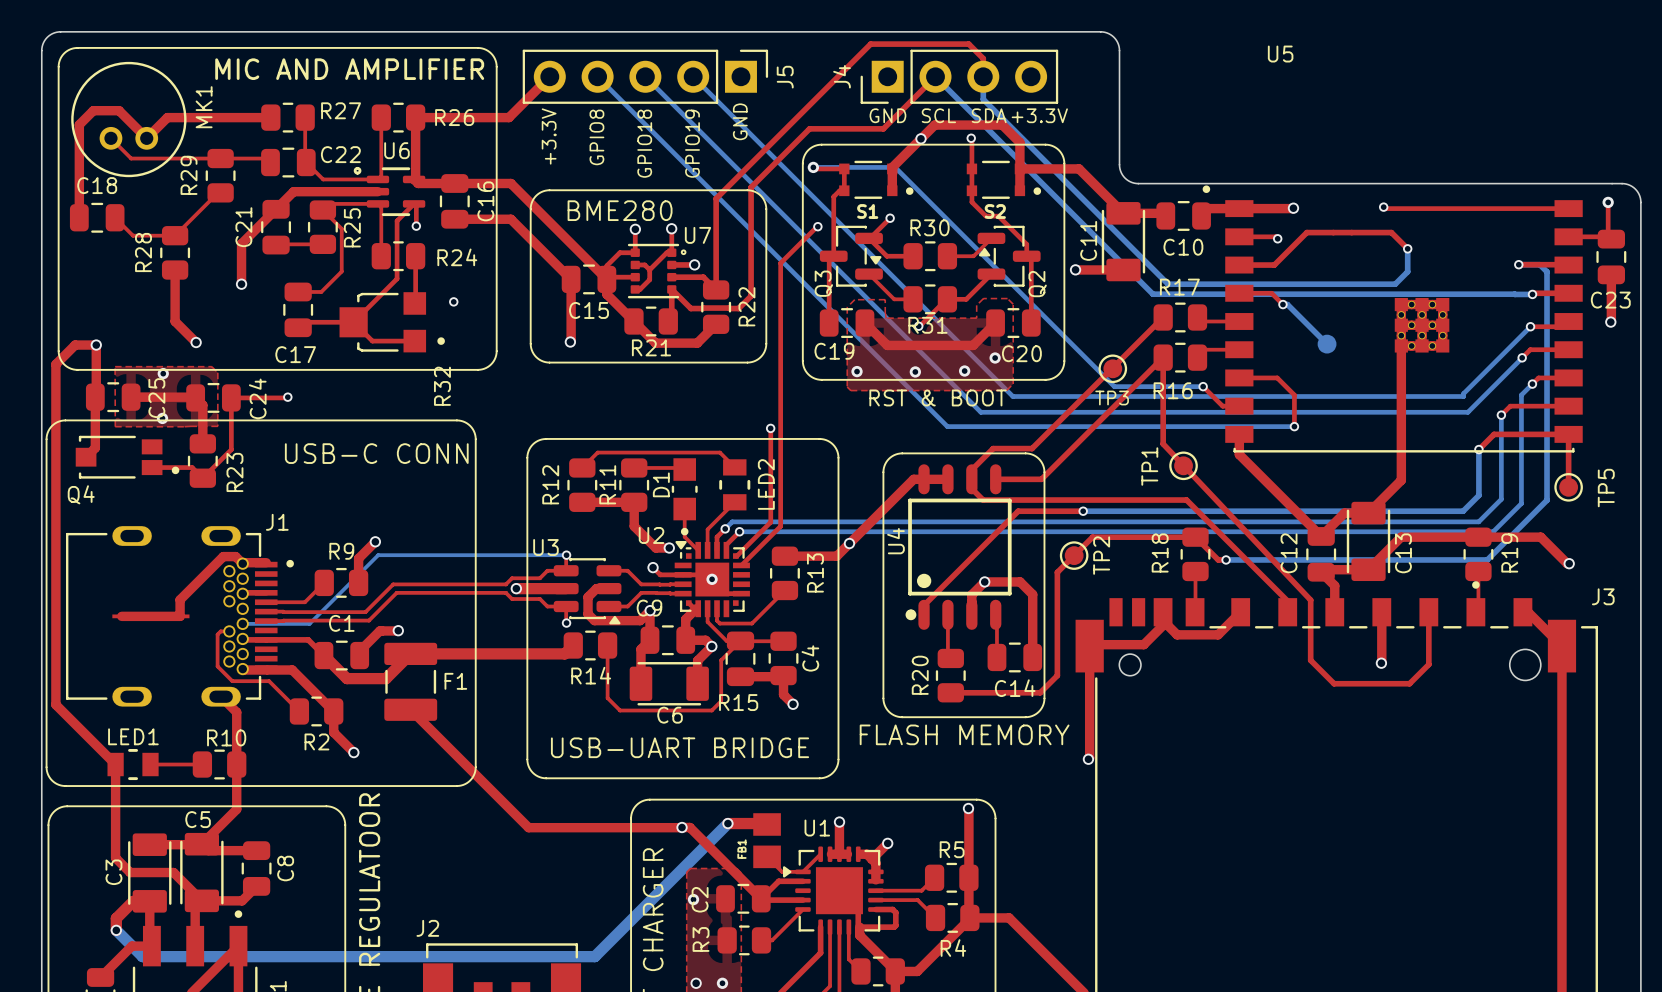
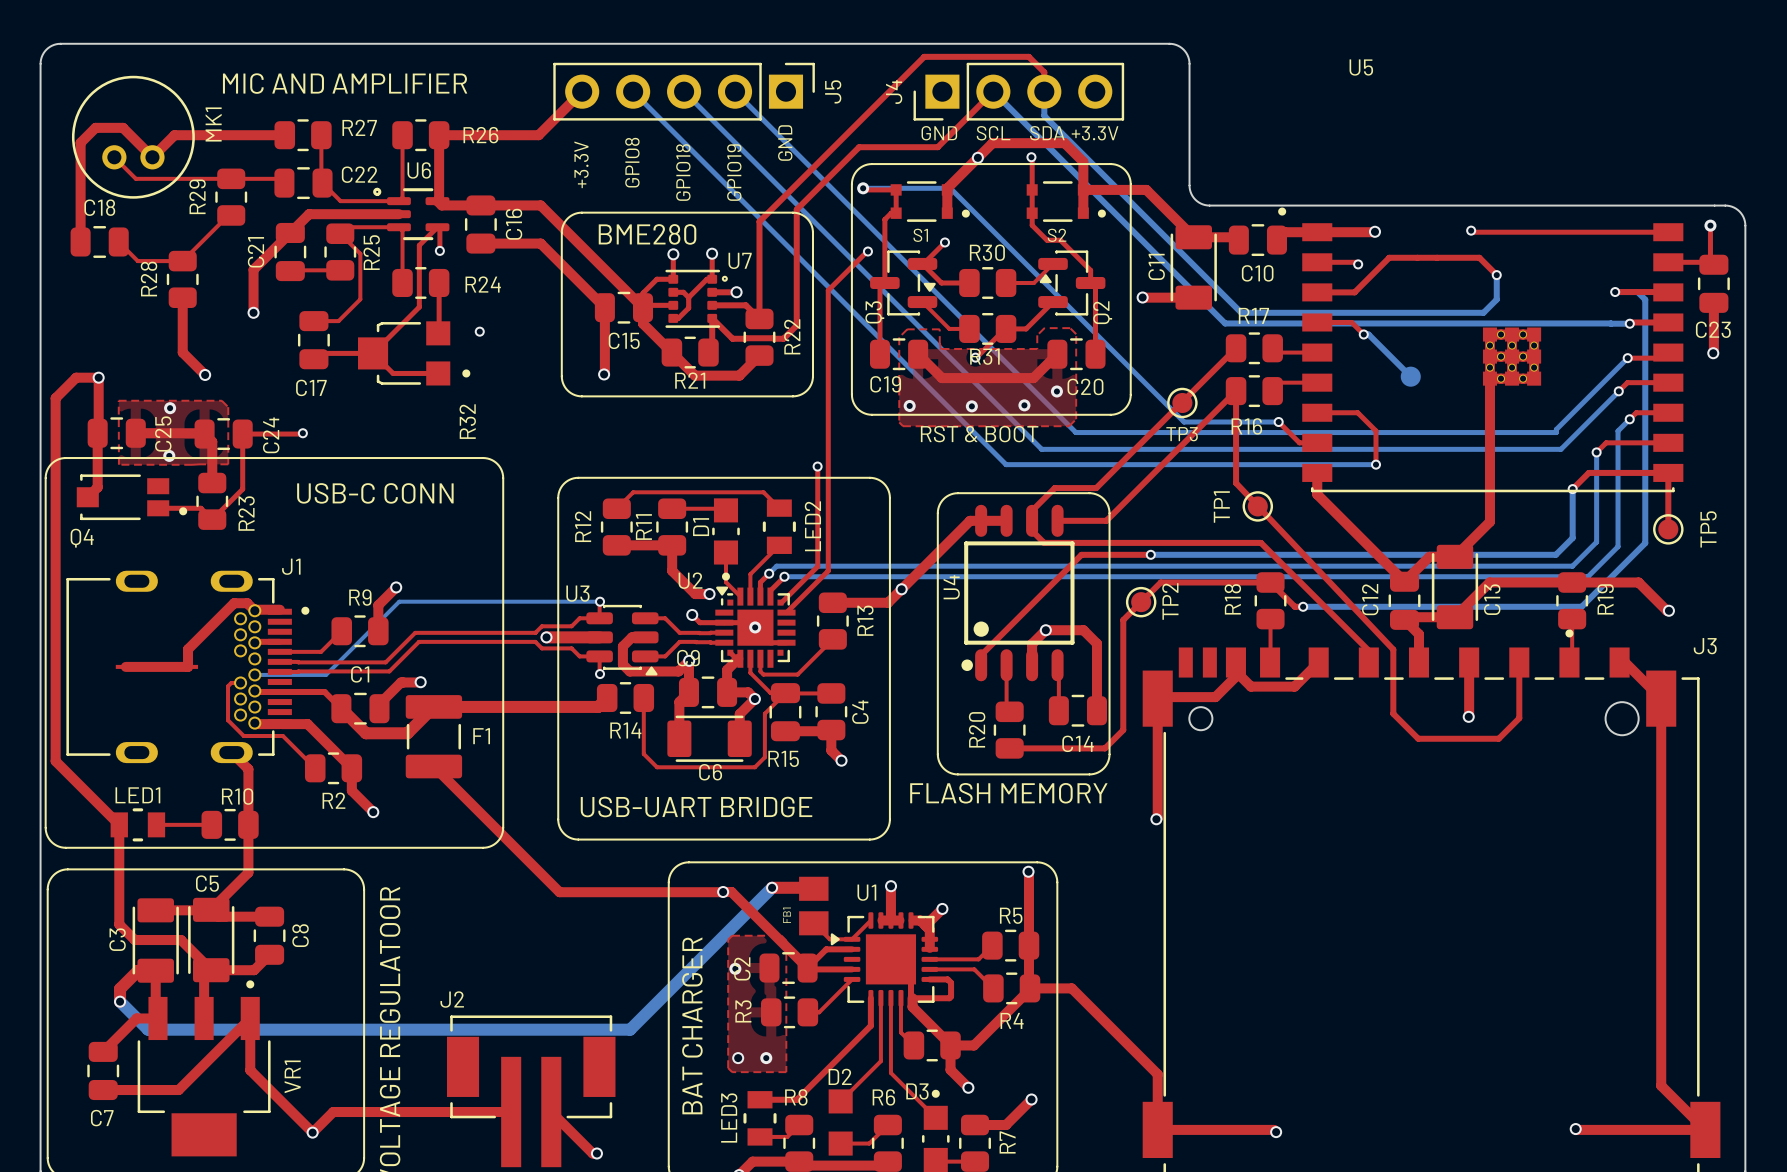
line: (77, 47) (477, 47) (489, 52) (494, 58) (496, 66) (496, 351) (492, 362) (486, 368) (477, 369) (77, 369) (65, 365) (60, 359) (58, 351) (58, 66) (64, 53) (77, 47) -> none

